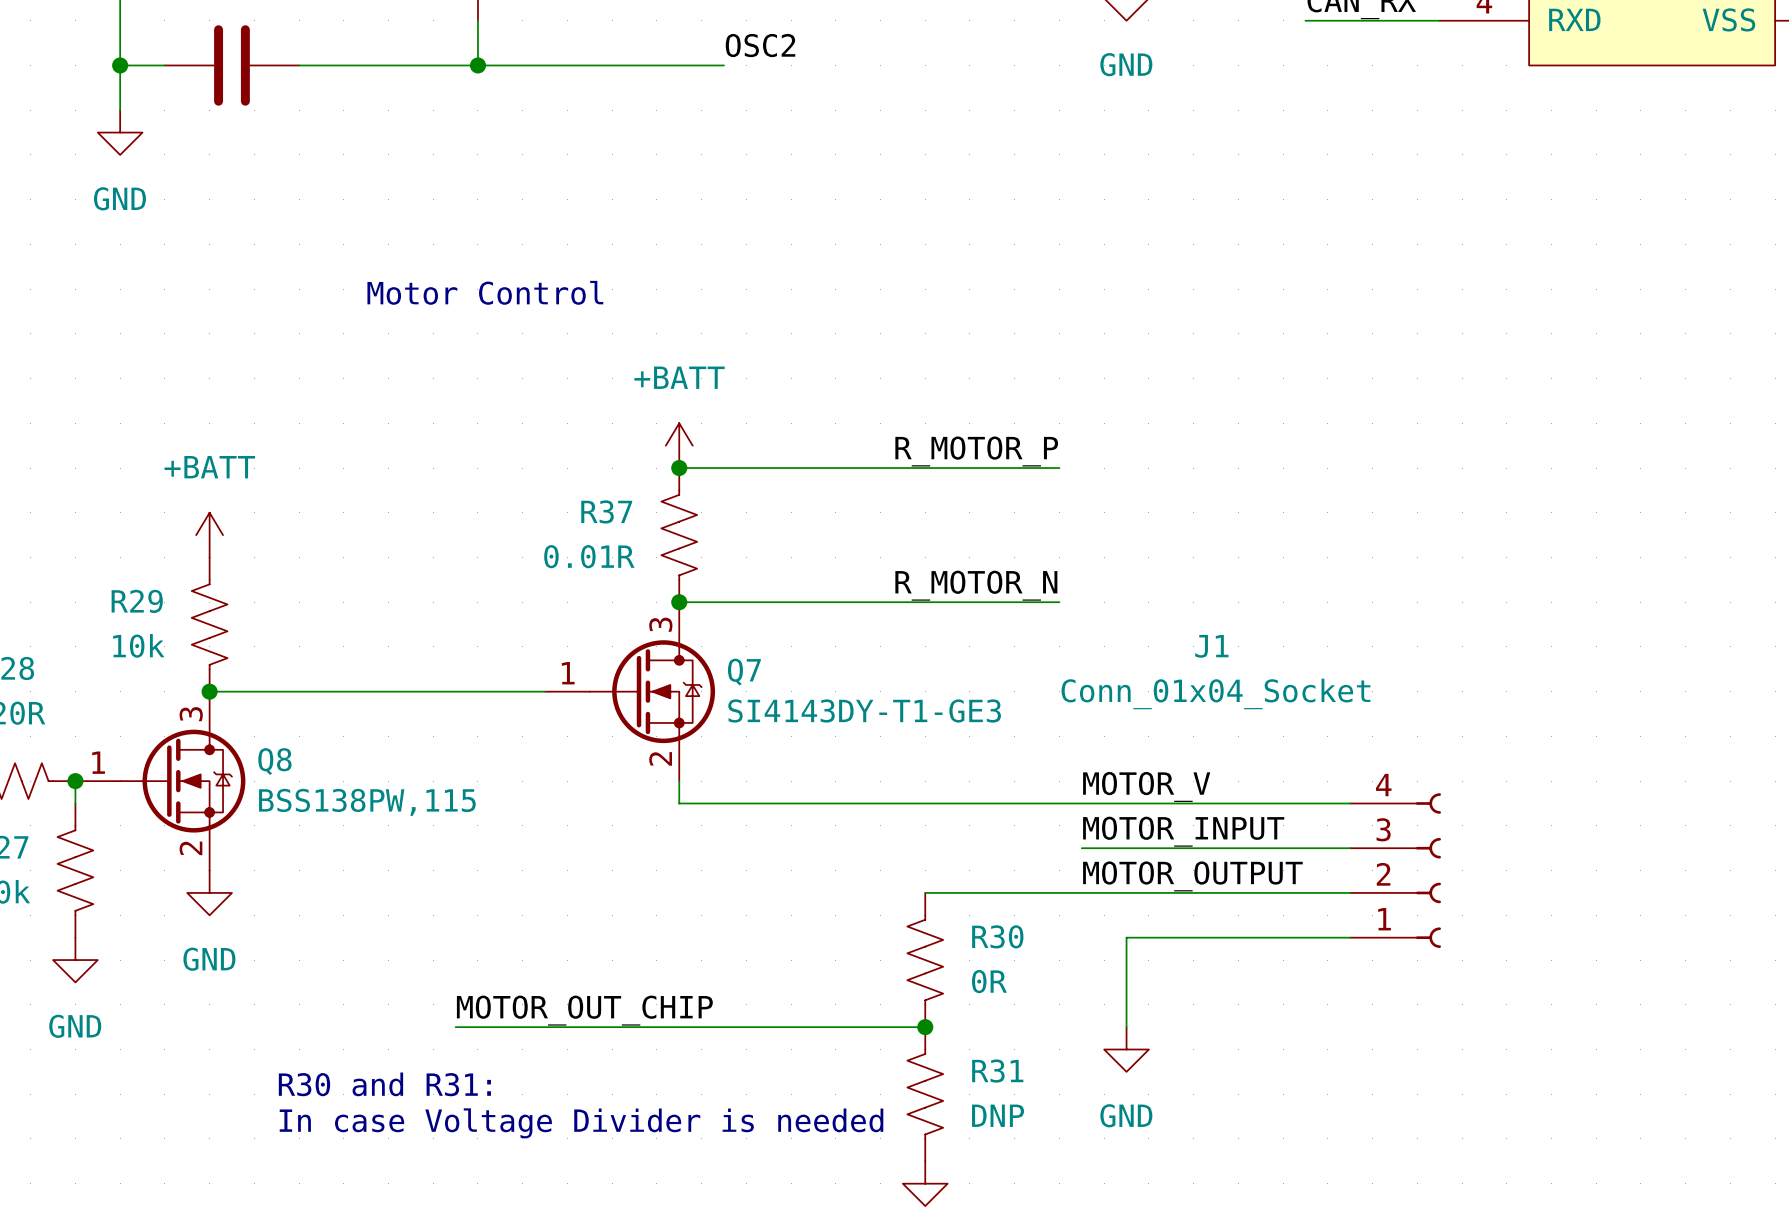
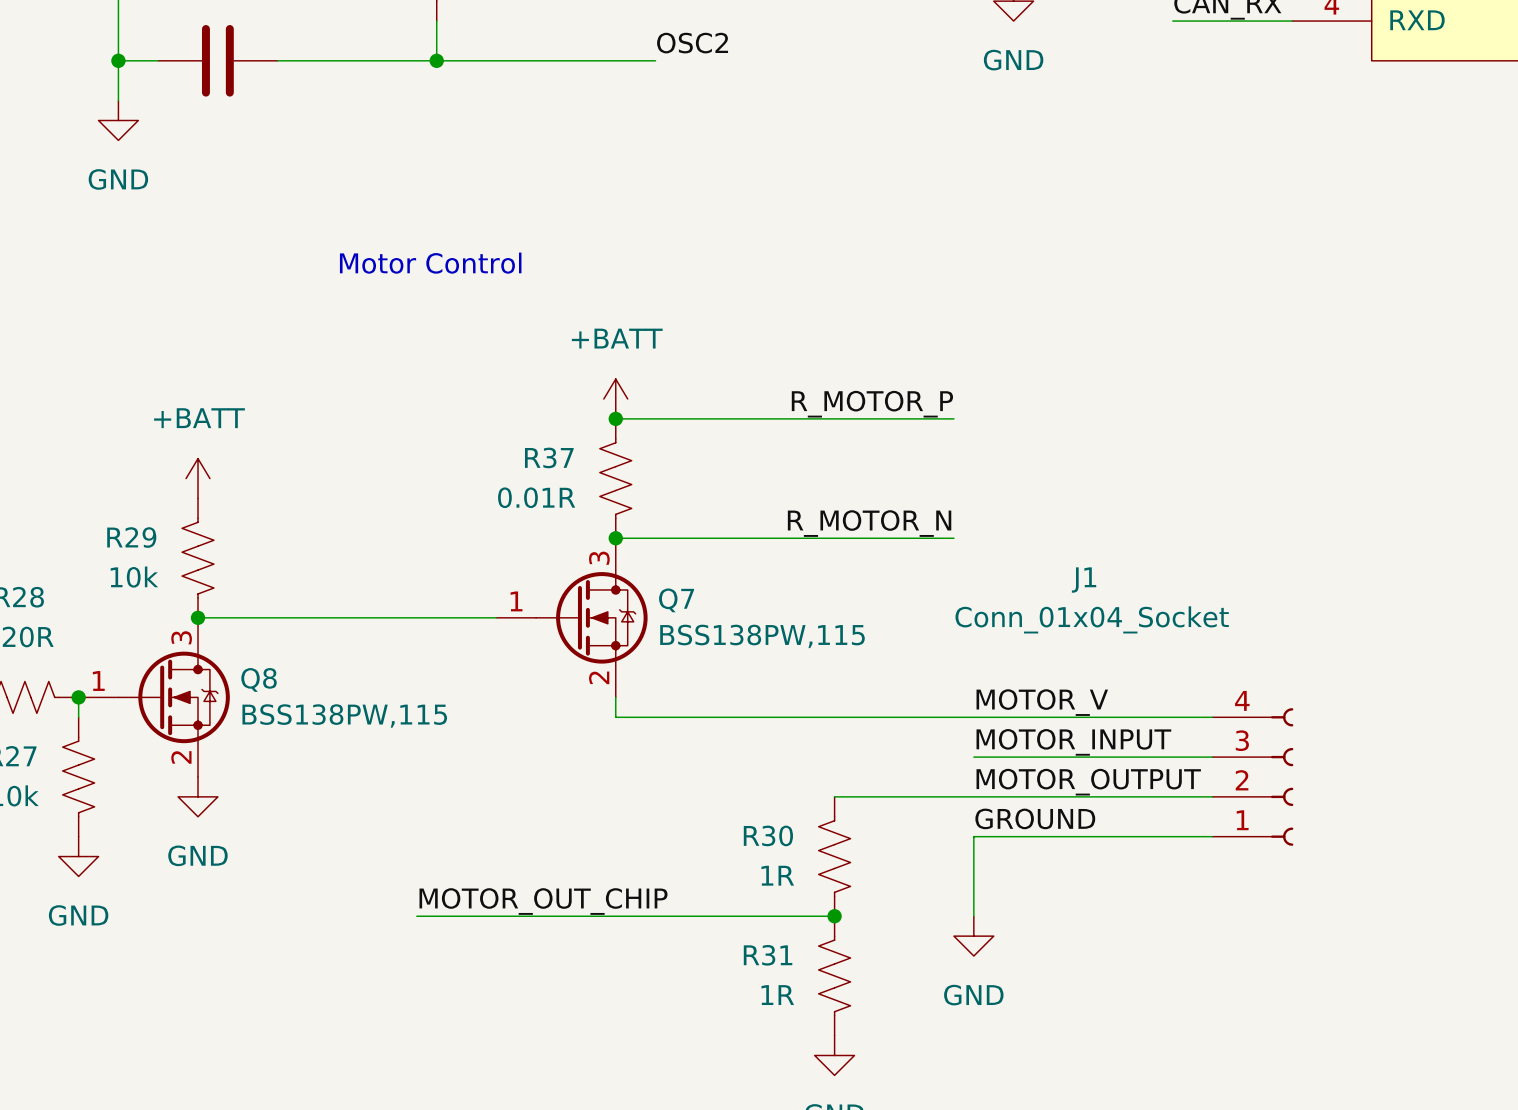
Q7 value: SI4143DY-T1-GE3 (864, 710) -> BSS138PW,115 (762, 636)
label: none -> GROUND (1035, 818)
R30 name position: R30 (997, 936) -> R30 (768, 835)
wire: (1126, 937) (1126, 1027) -> (1013, 836) (973, 836) (973, 916)
R30 value: 0R (989, 981) -> 1R (777, 875)
power symbol position: GND (1126, 1049) -> GND (973, 936)
R31 name position: R31 (997, 1071) -> R31 (768, 955)
text: R30 and R31: (384, 1084) -> none
R31 value: DNP (998, 1115) -> 1R (777, 995)
text: In case Voltage Divider is needed (581, 1123) -> none

